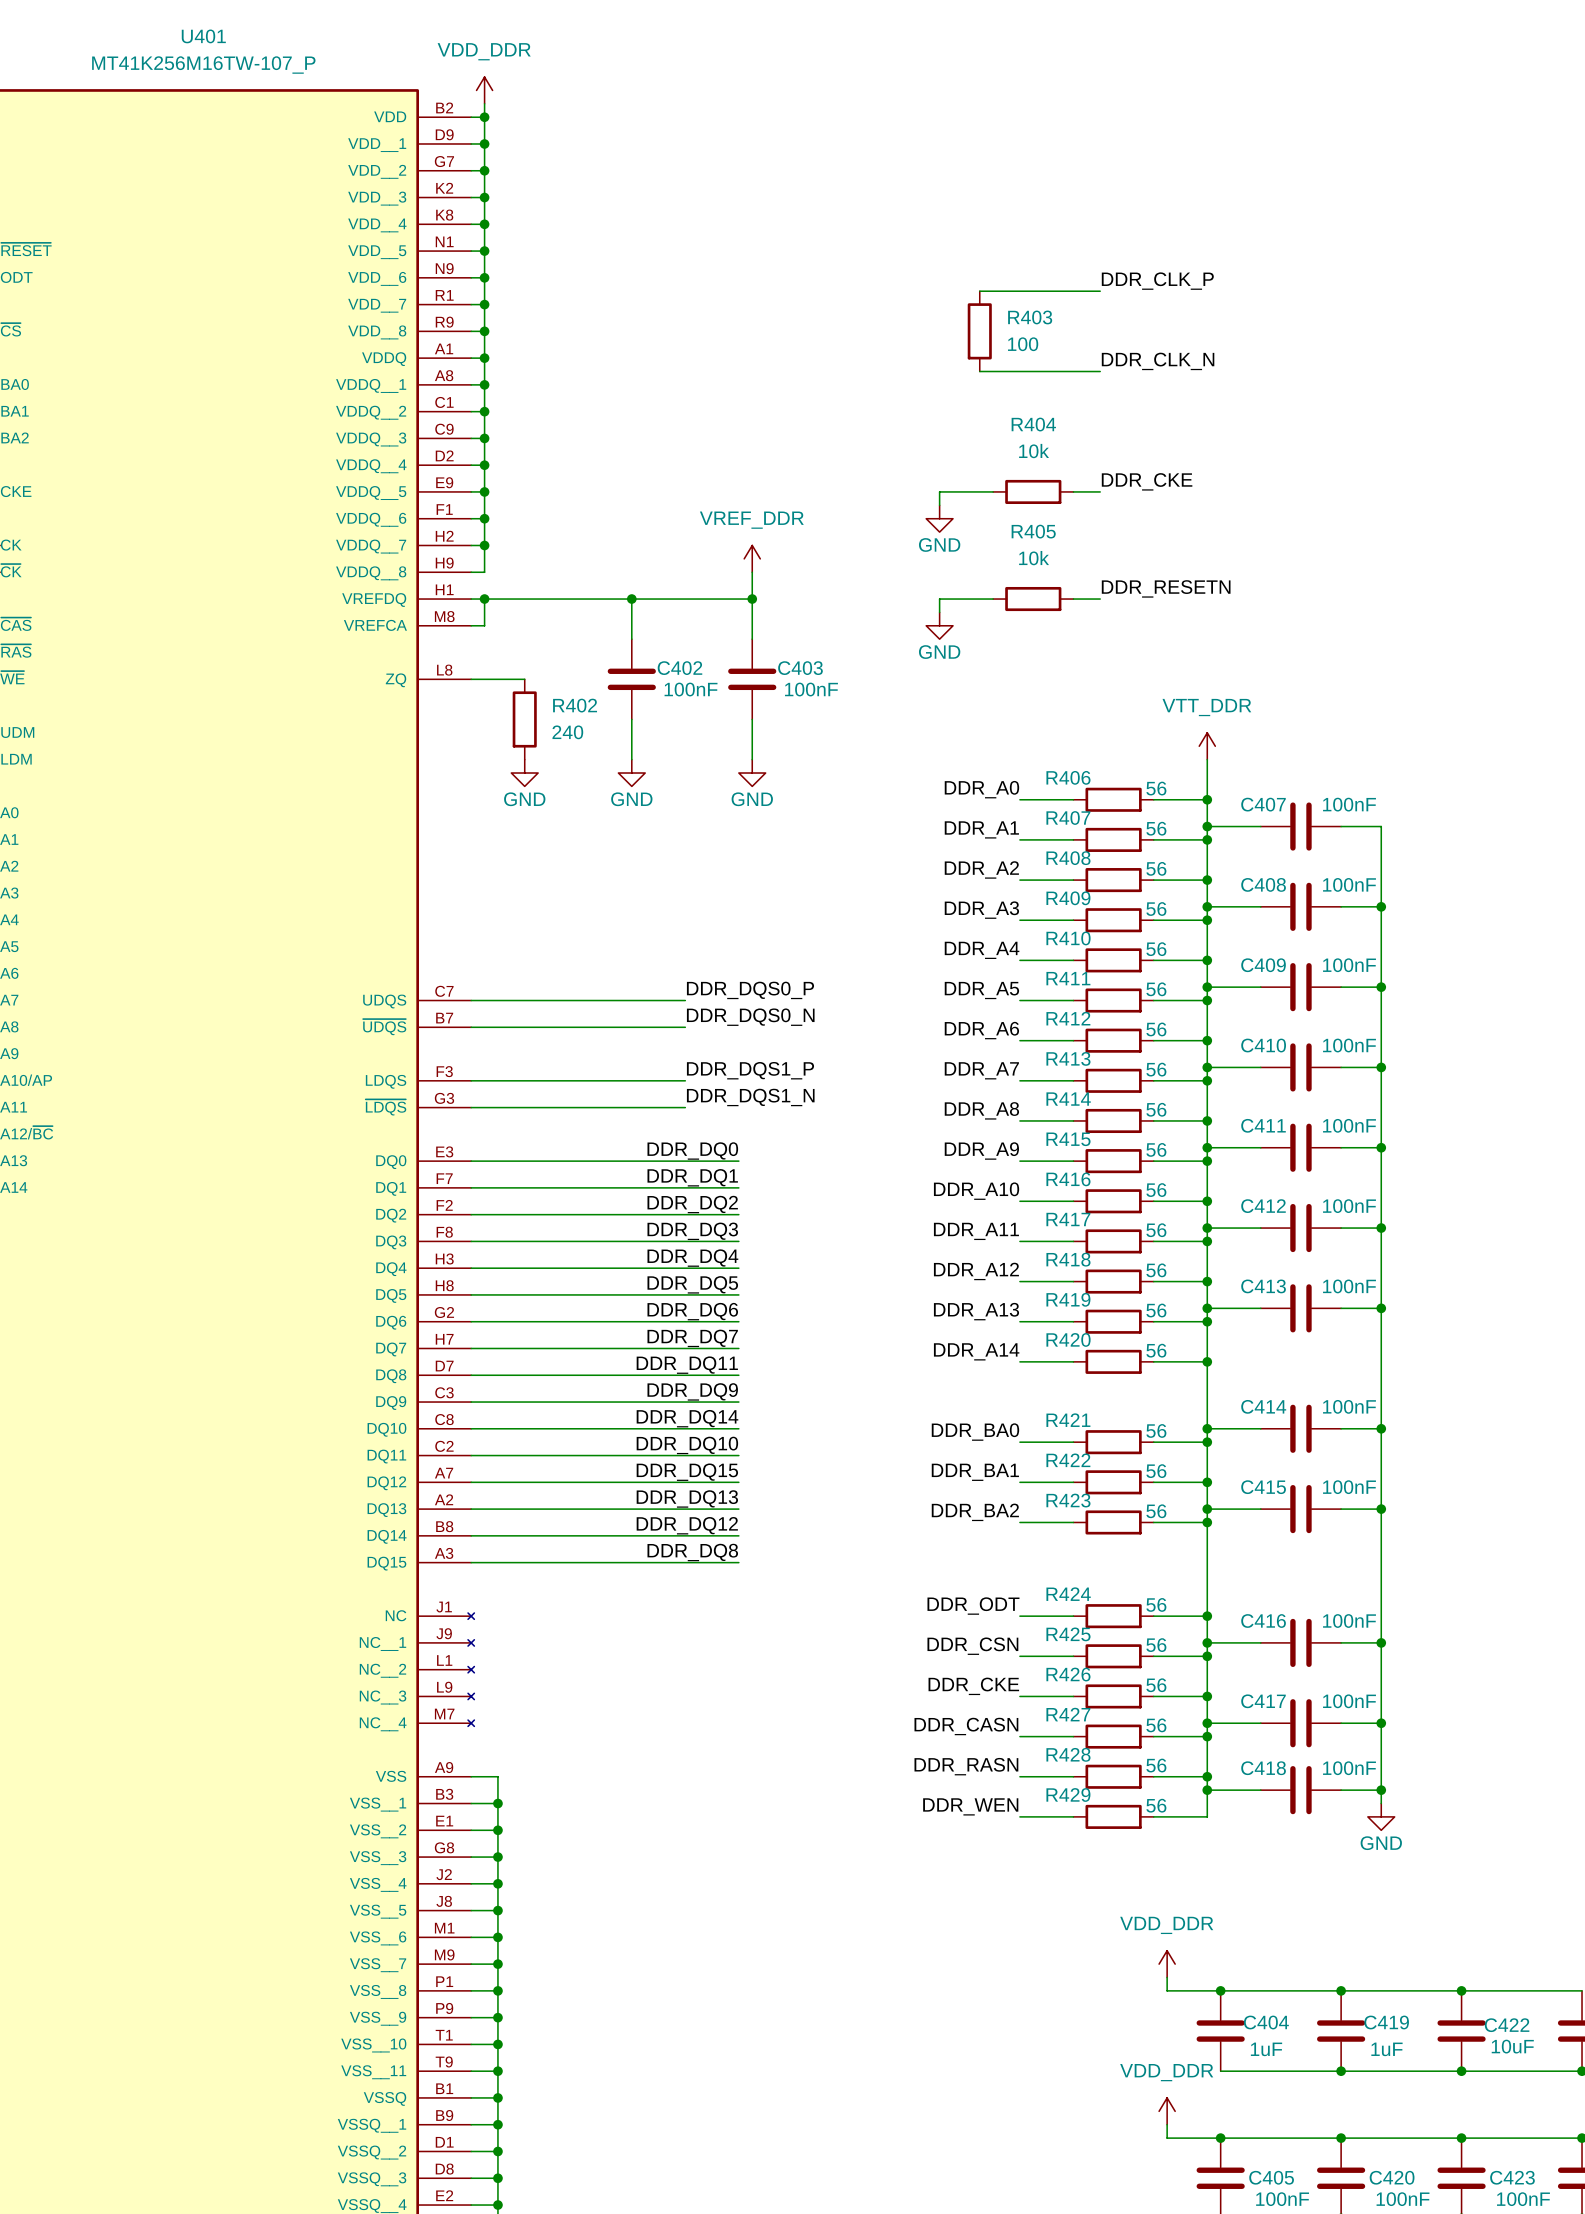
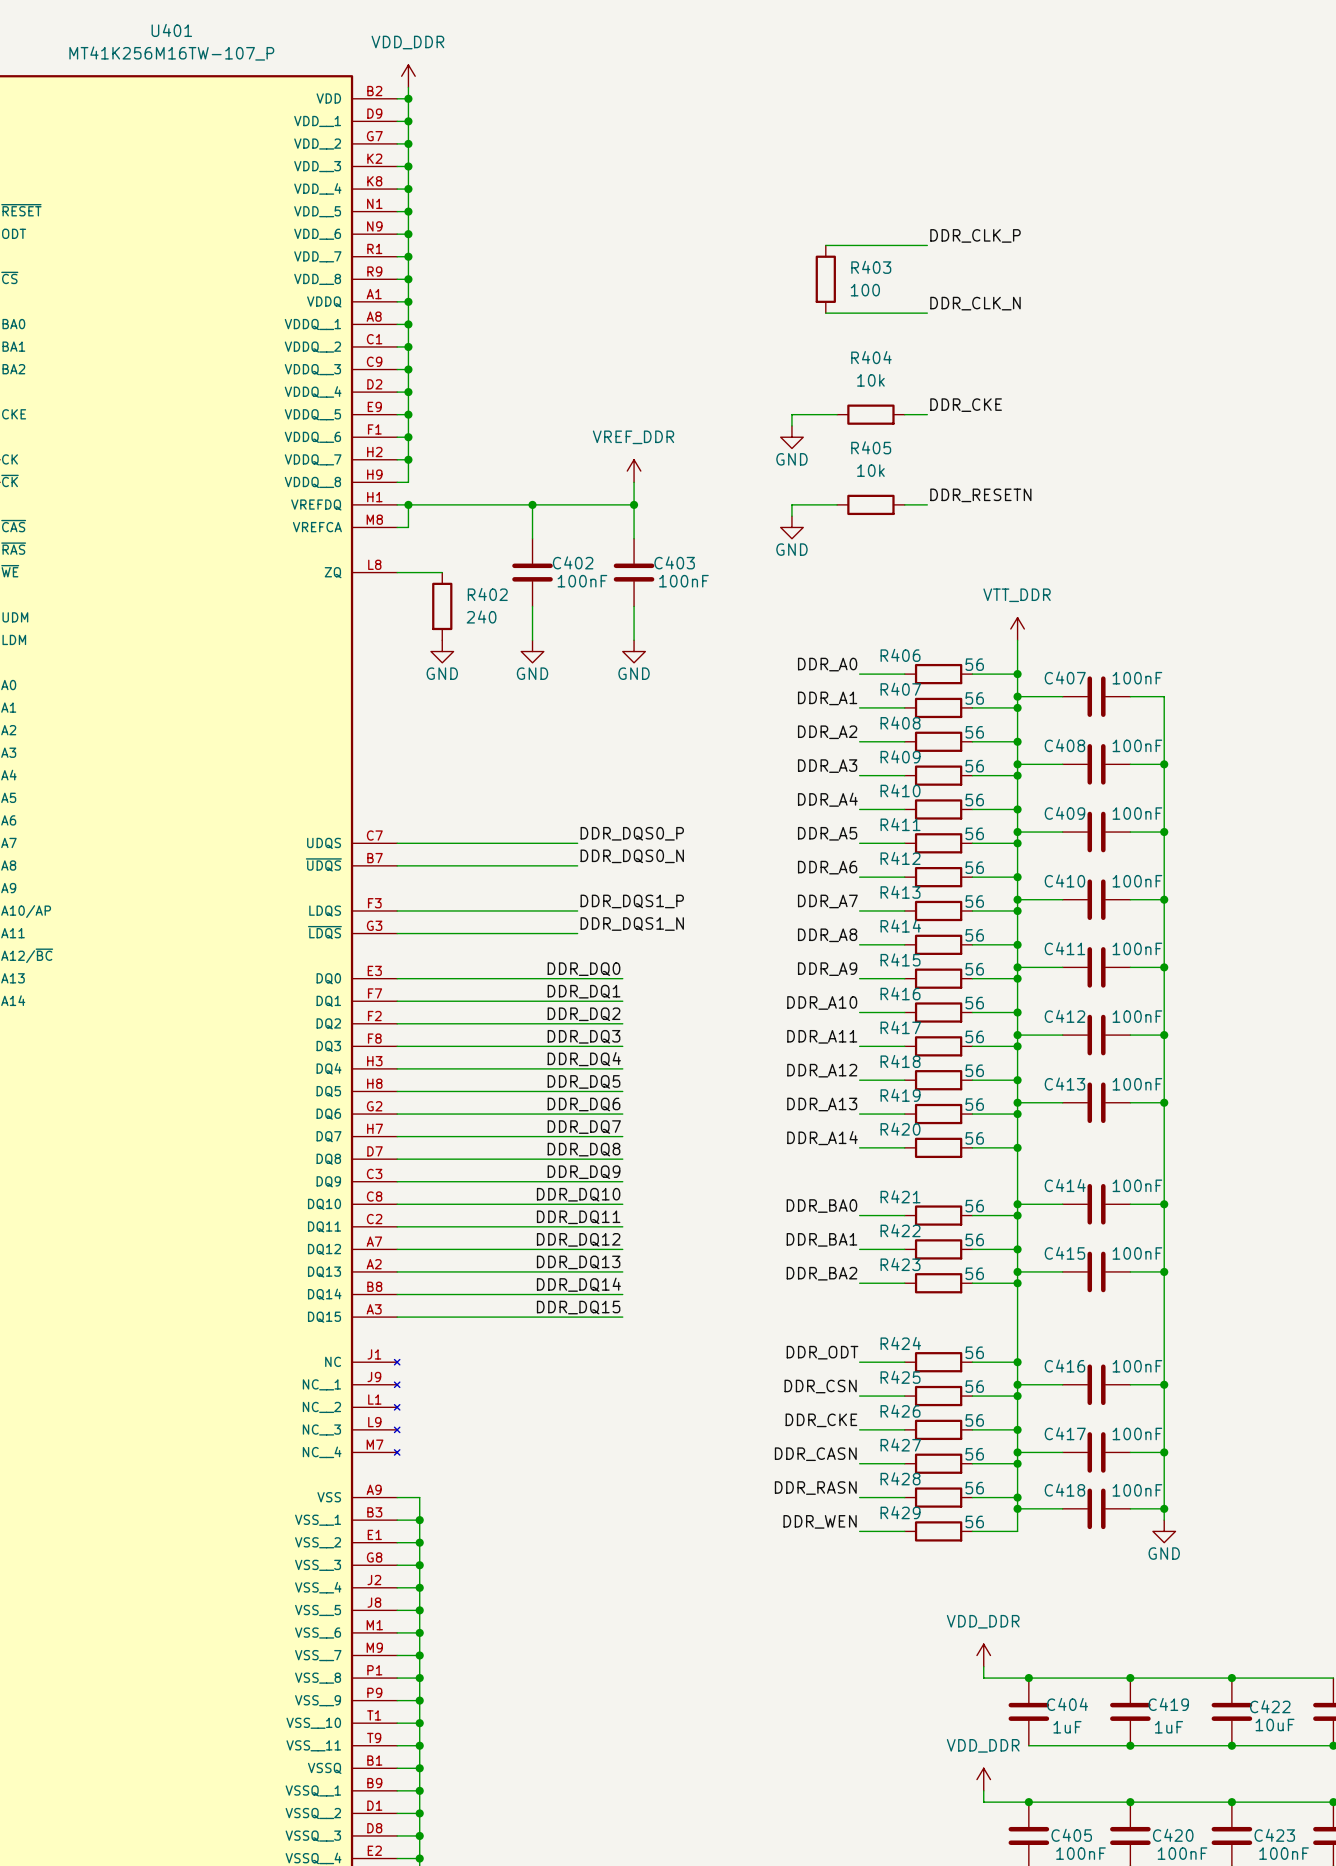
label: DDR_DQ11 (687, 1365) -> DDR_DQ8 (584, 1149)
label: DDR_DQ14 (687, 1418) -> DDR_DQ10 (578, 1194)
label: DDR_DQ10 (687, 1445) -> DDR_DQ11 (578, 1217)
label: DDR_DQ15 (687, 1472) -> DDR_DQ12 (578, 1239)
label: DDR_DQ12 (687, 1525) -> DDR_DQ14 (578, 1284)
label: DDR_DQ8 (692, 1552) -> DDR_DQ15 (578, 1307)

